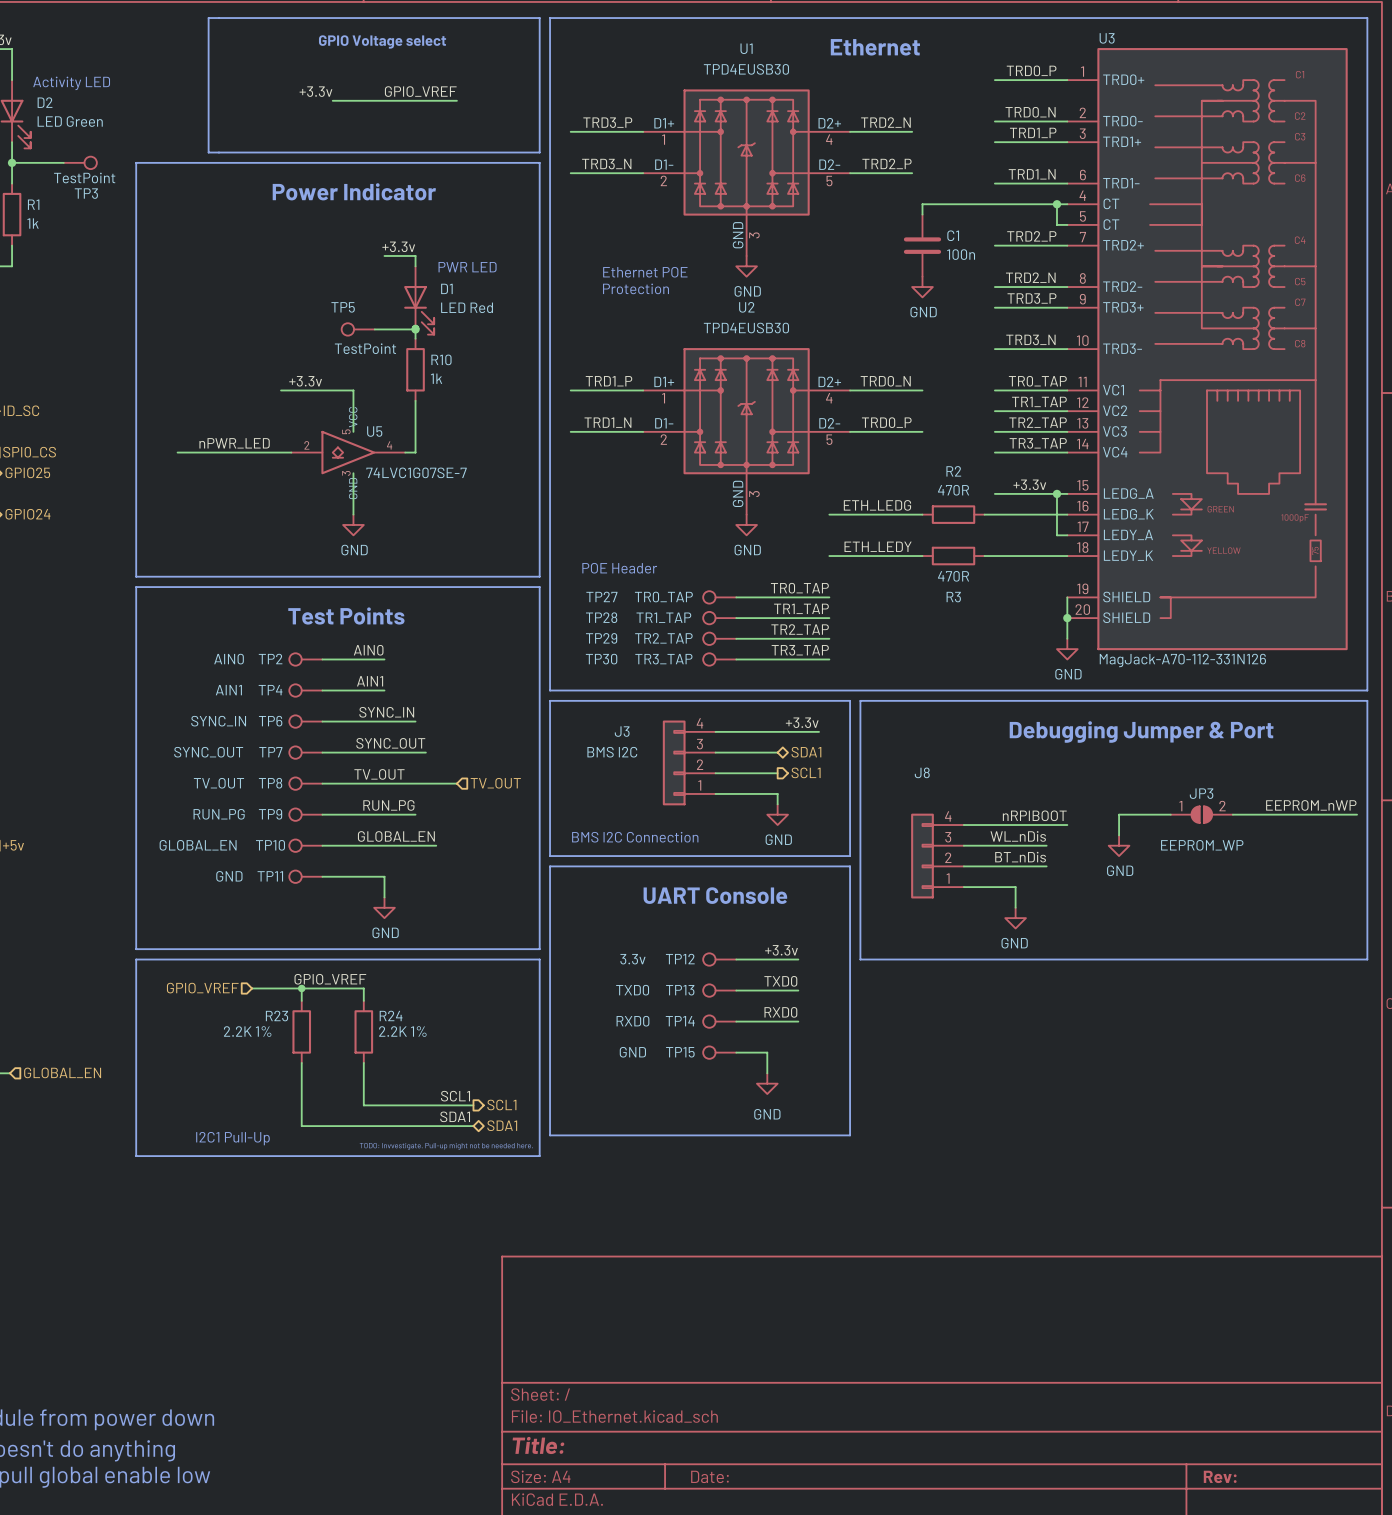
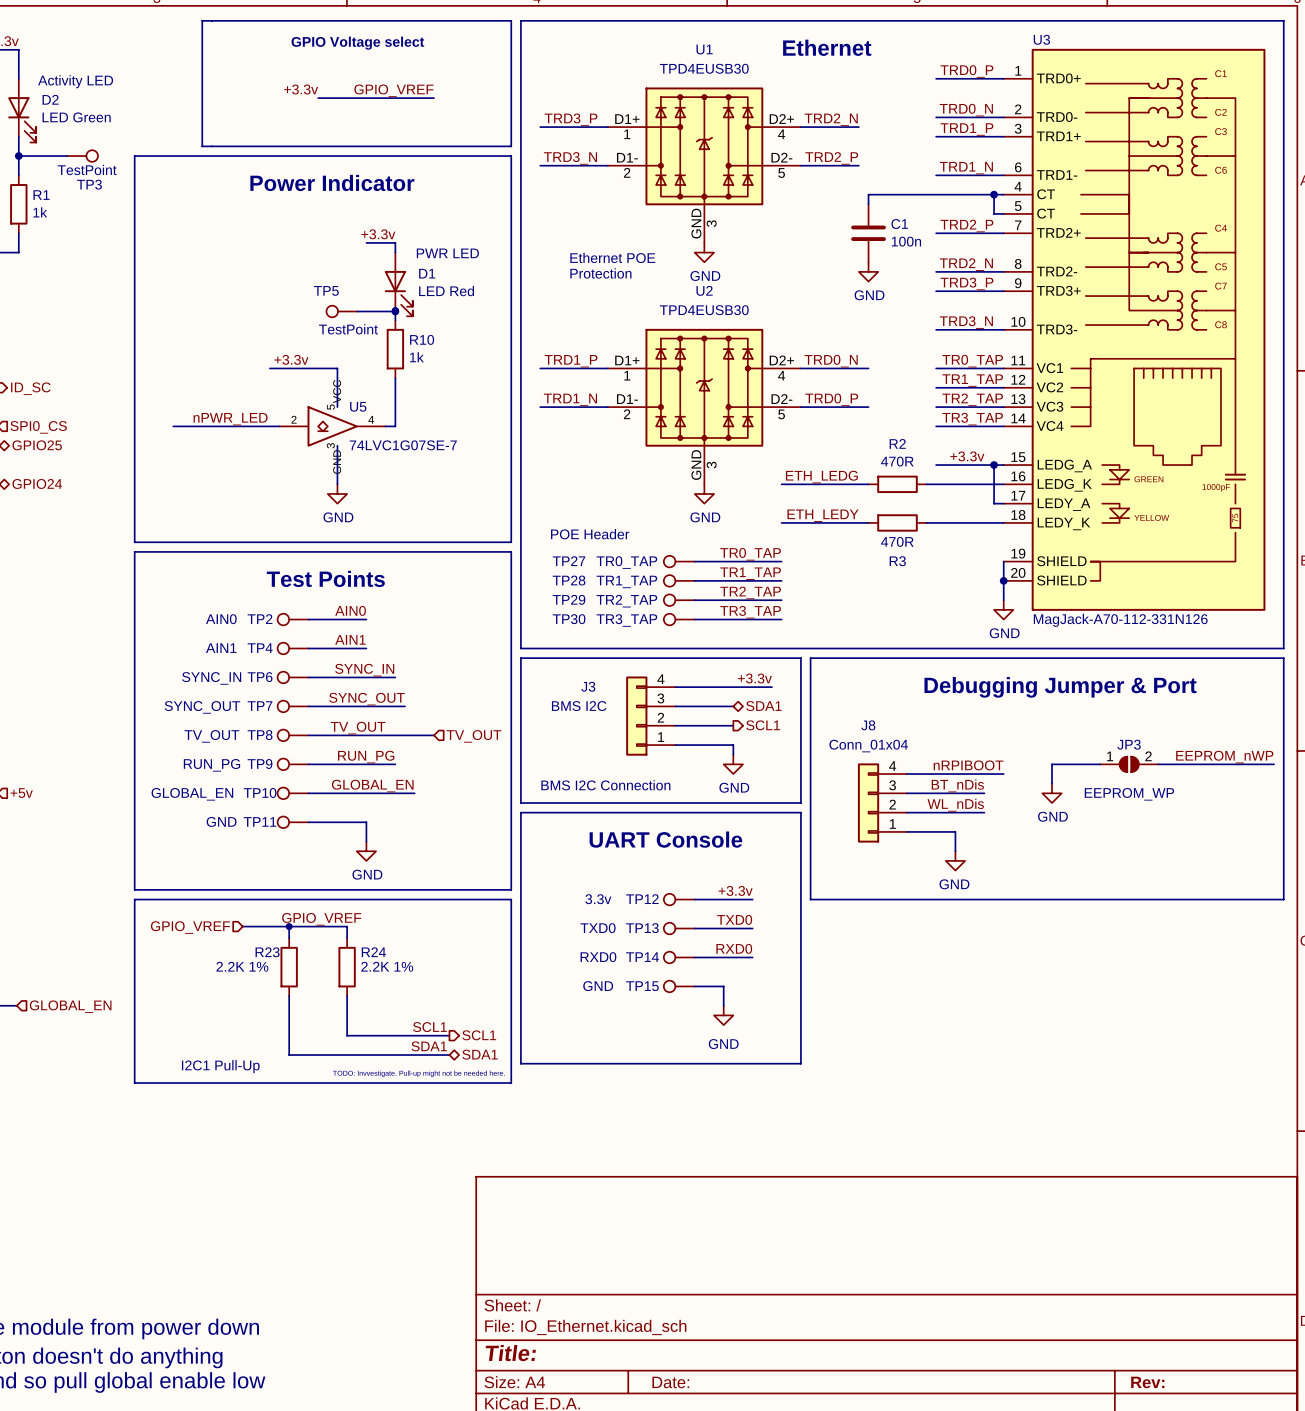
J8 value: none -> Conn_01x04 (868, 746)
label: WL_nDis (1018, 836) -> BT_nDis (957, 785)
label: BT_nDis (1020, 857) -> WL_nDis (955, 805)

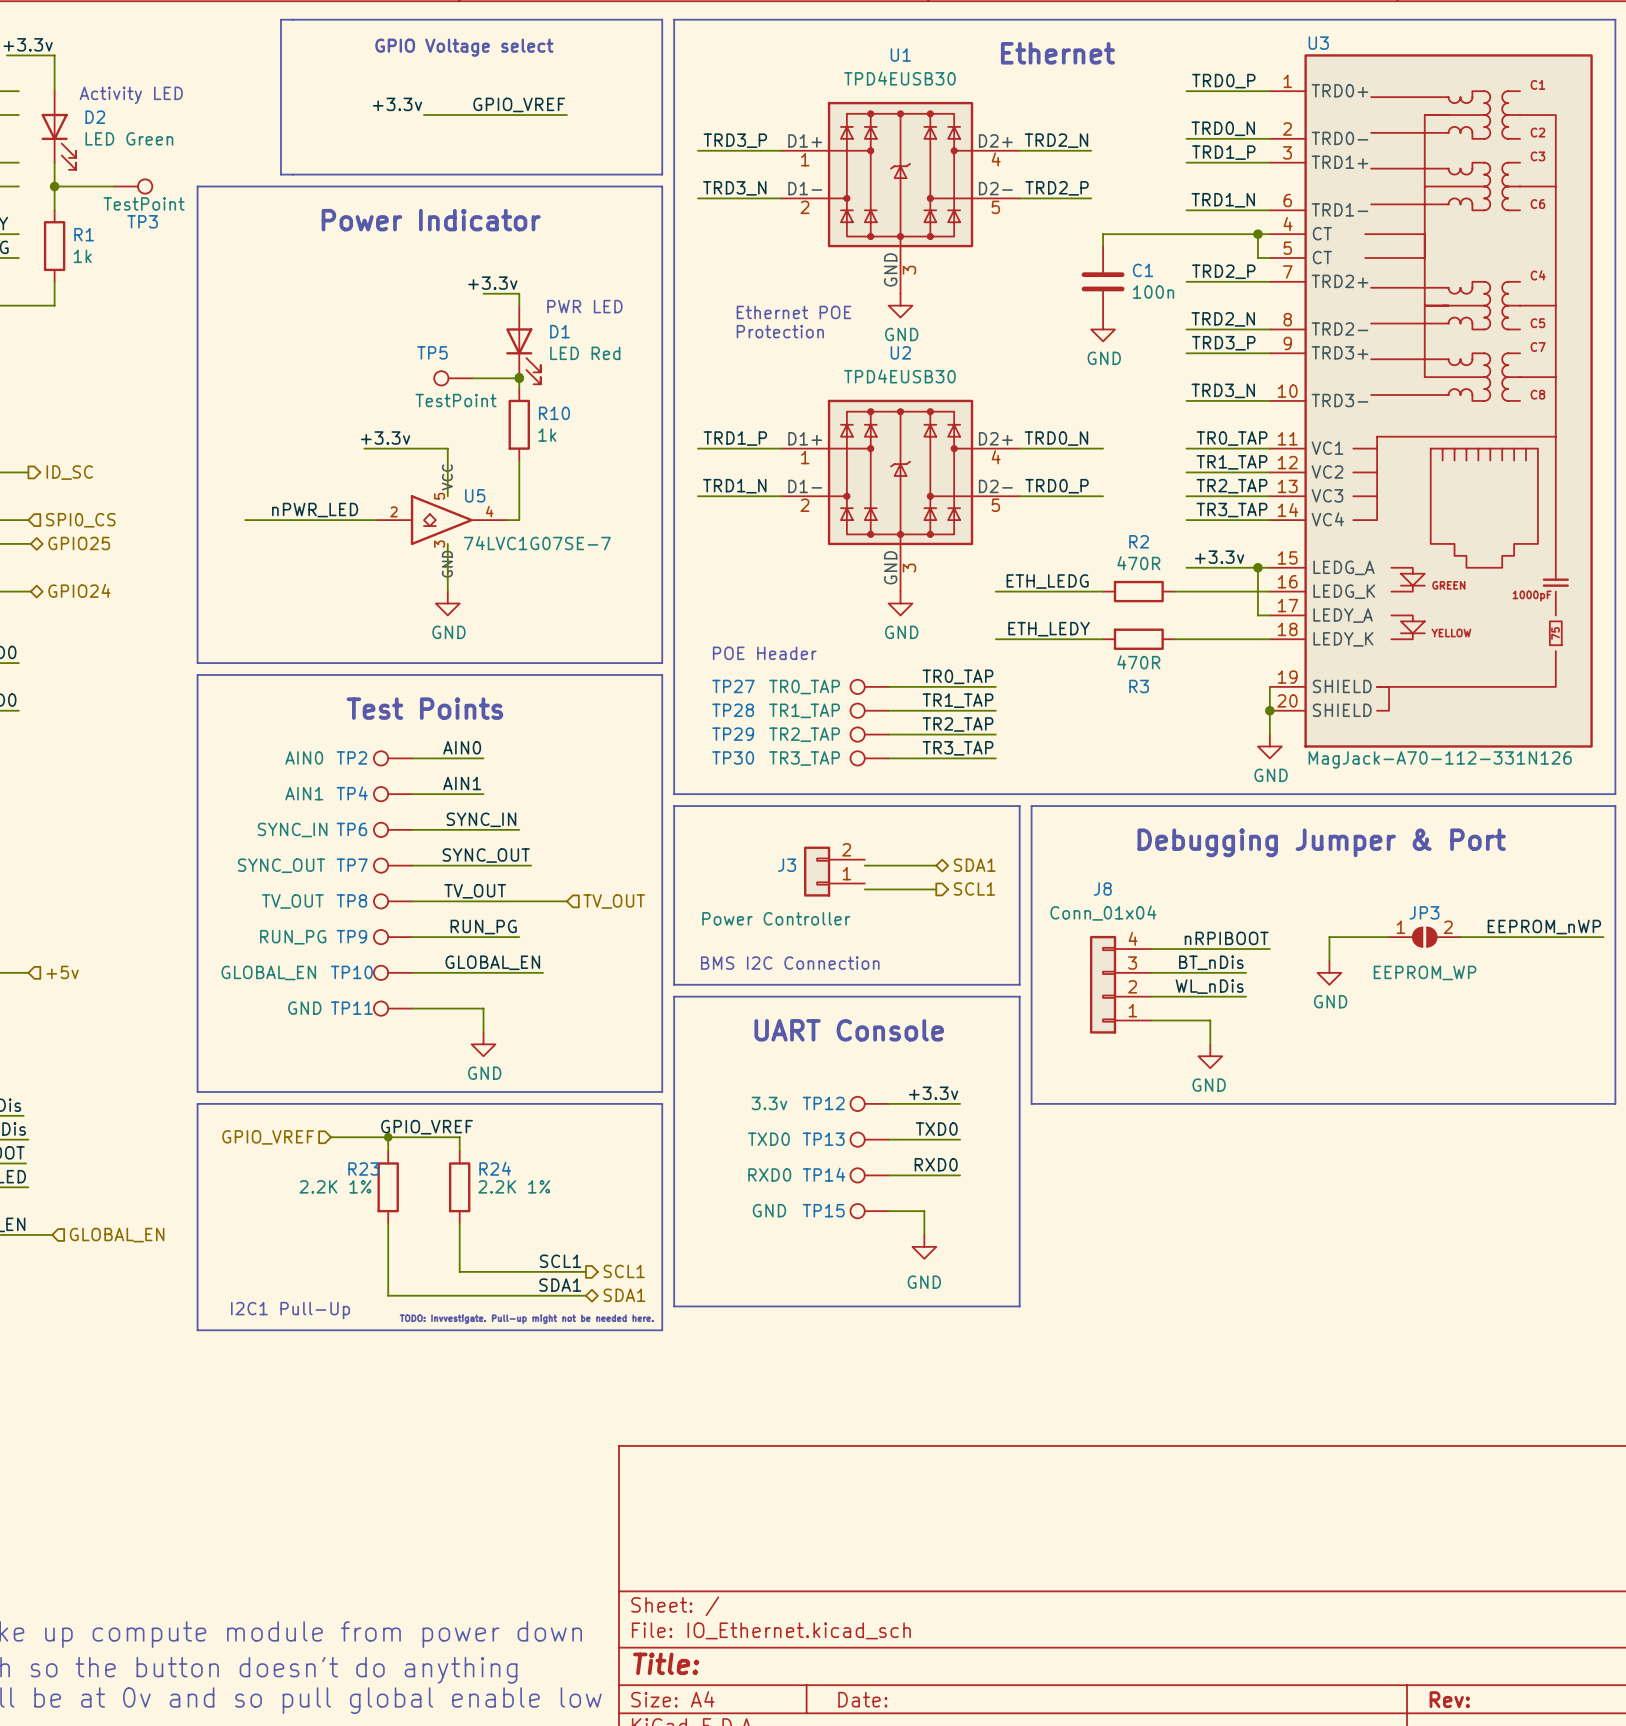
J3 symbol: [626, 676, 676, 756] -> [804, 846, 865, 897]
label: +3.3v (754, 678) -> none
J3 name position: J3 (588, 686) -> J3 (787, 865)
wire: (675, 687) (771, 687) -> none
J3 value: BMS I2C (579, 706) -> Power Controller (776, 918)
wire: (675, 745) (733, 745) (733, 754) -> none
power symbol: GND (733, 764) -> none

